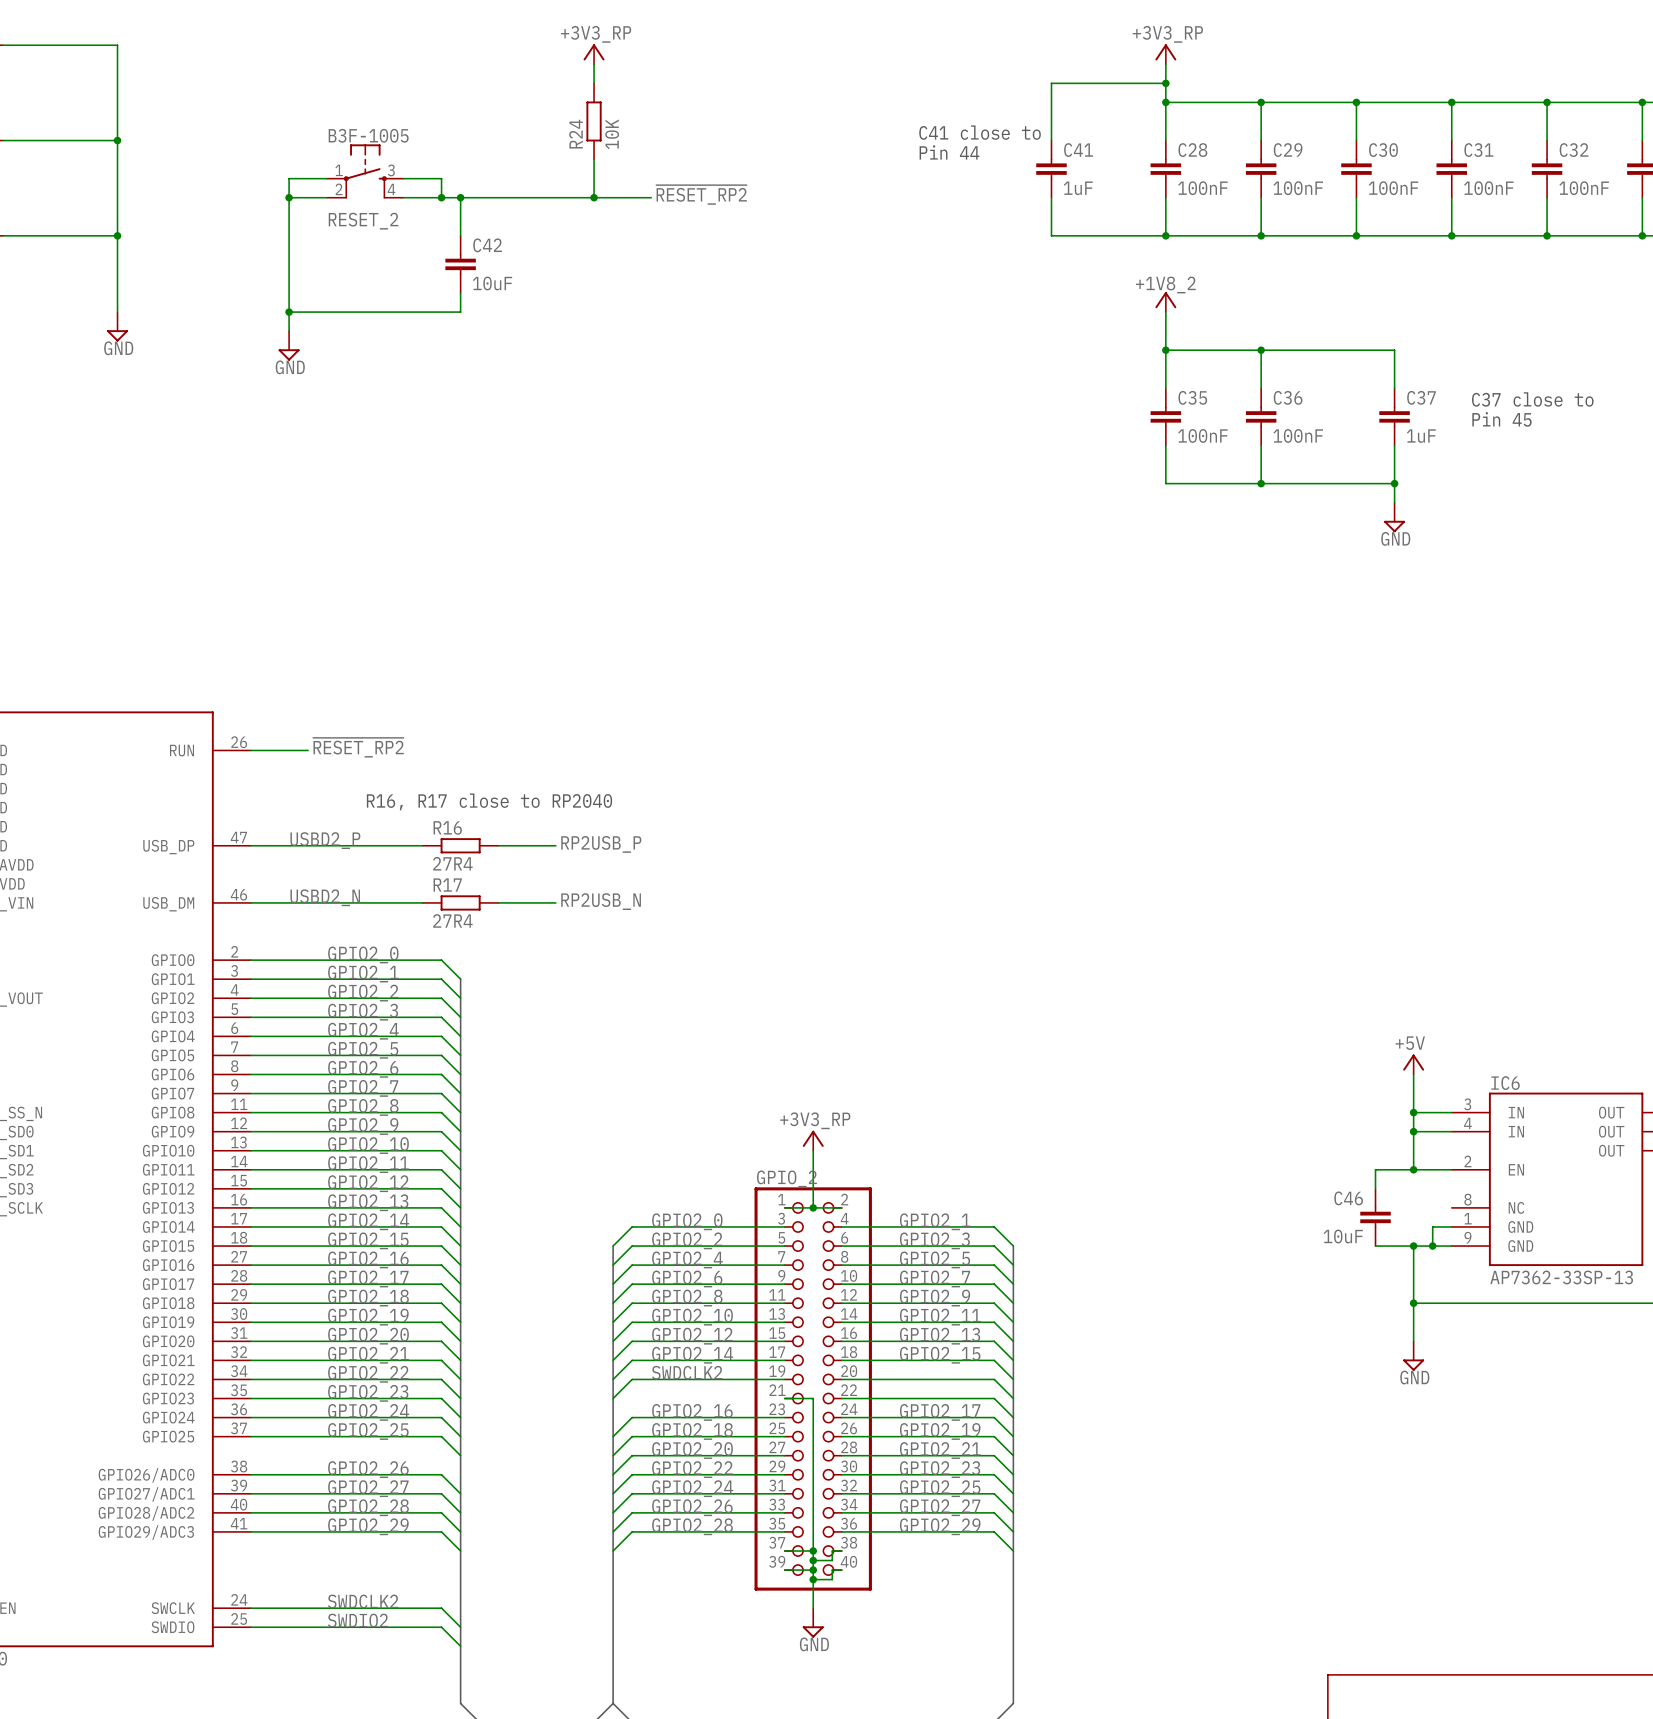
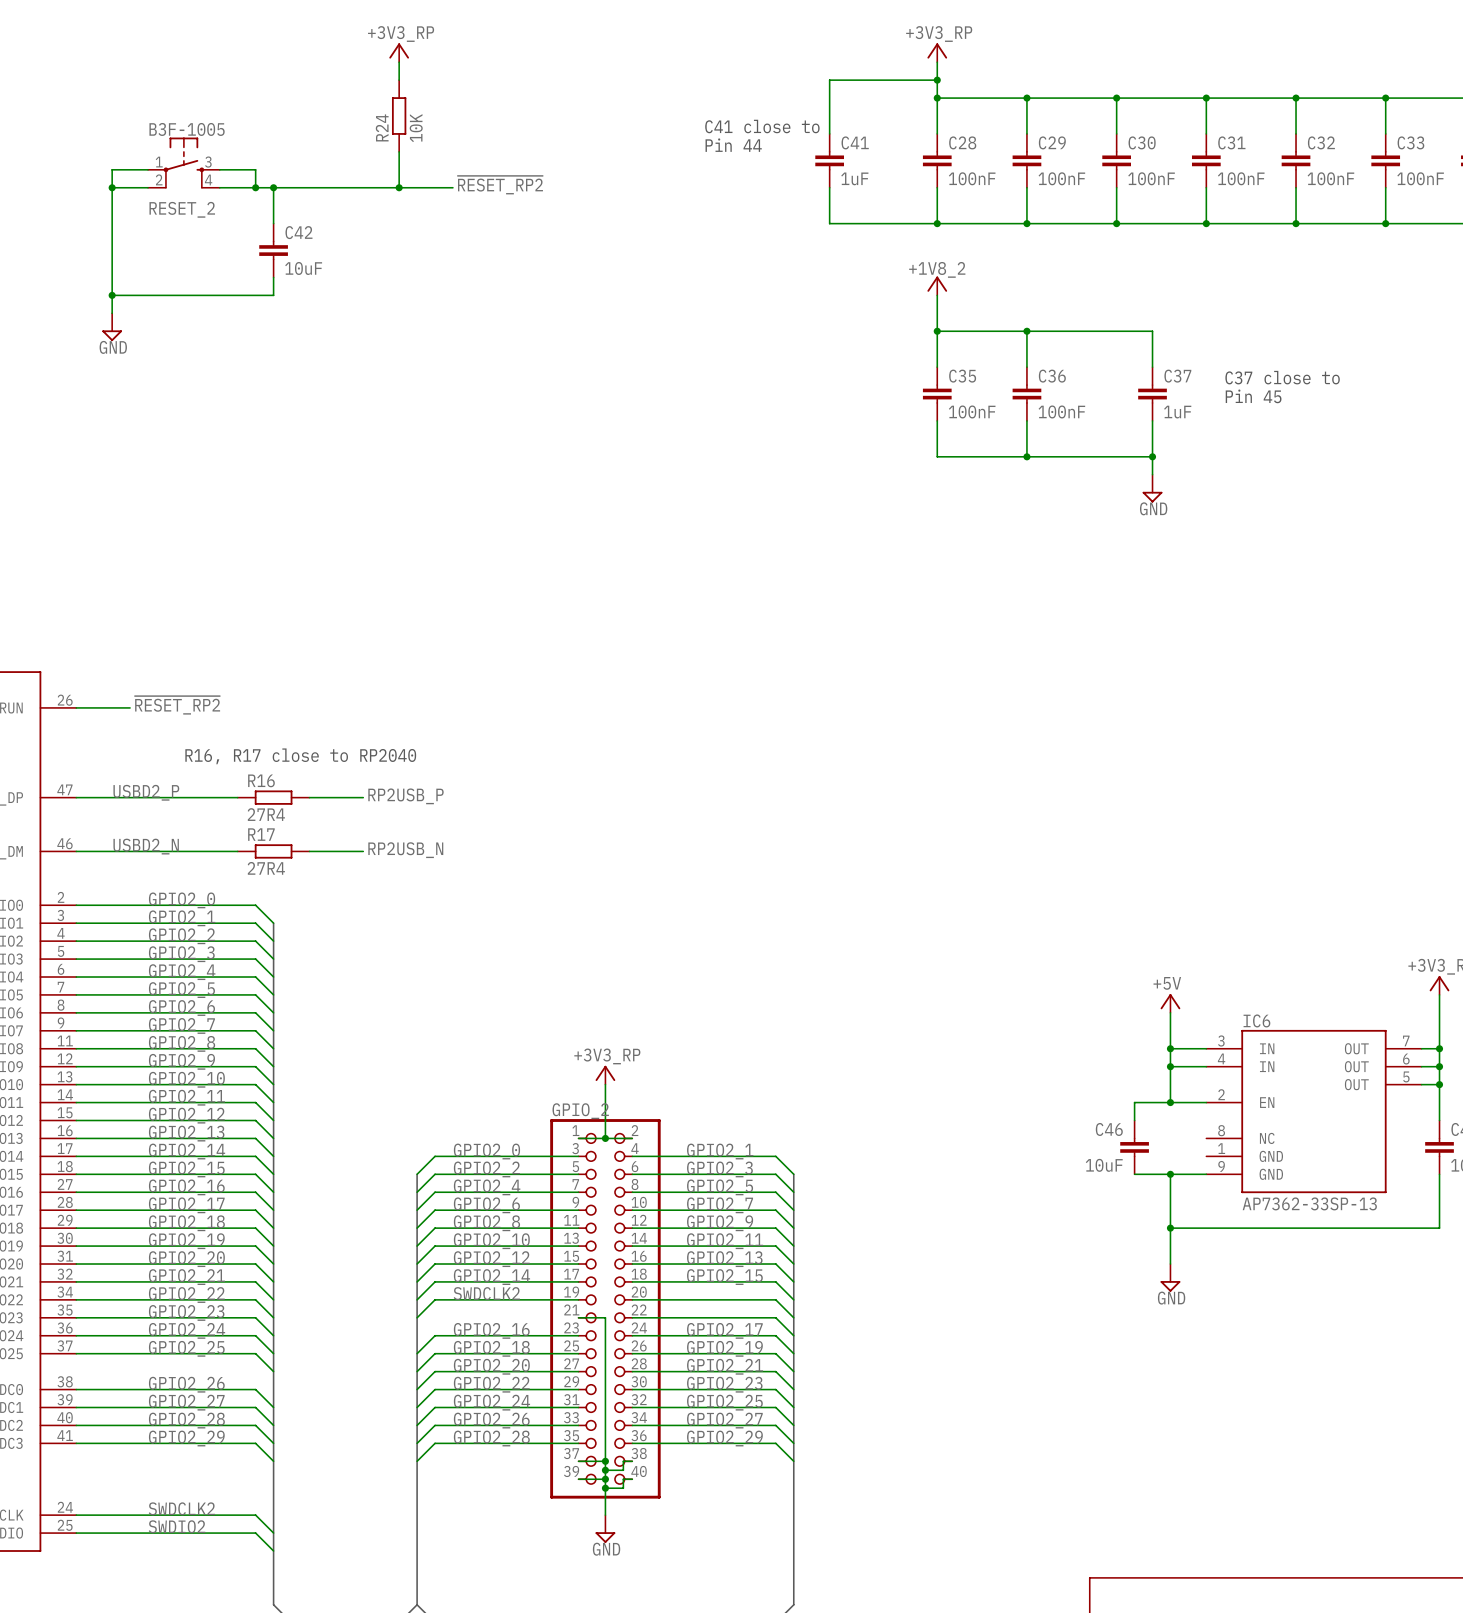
wire: (1451, 1226) (1432, 1226) (1432, 1246) -> none
junction: (1432, 1246) -> none

